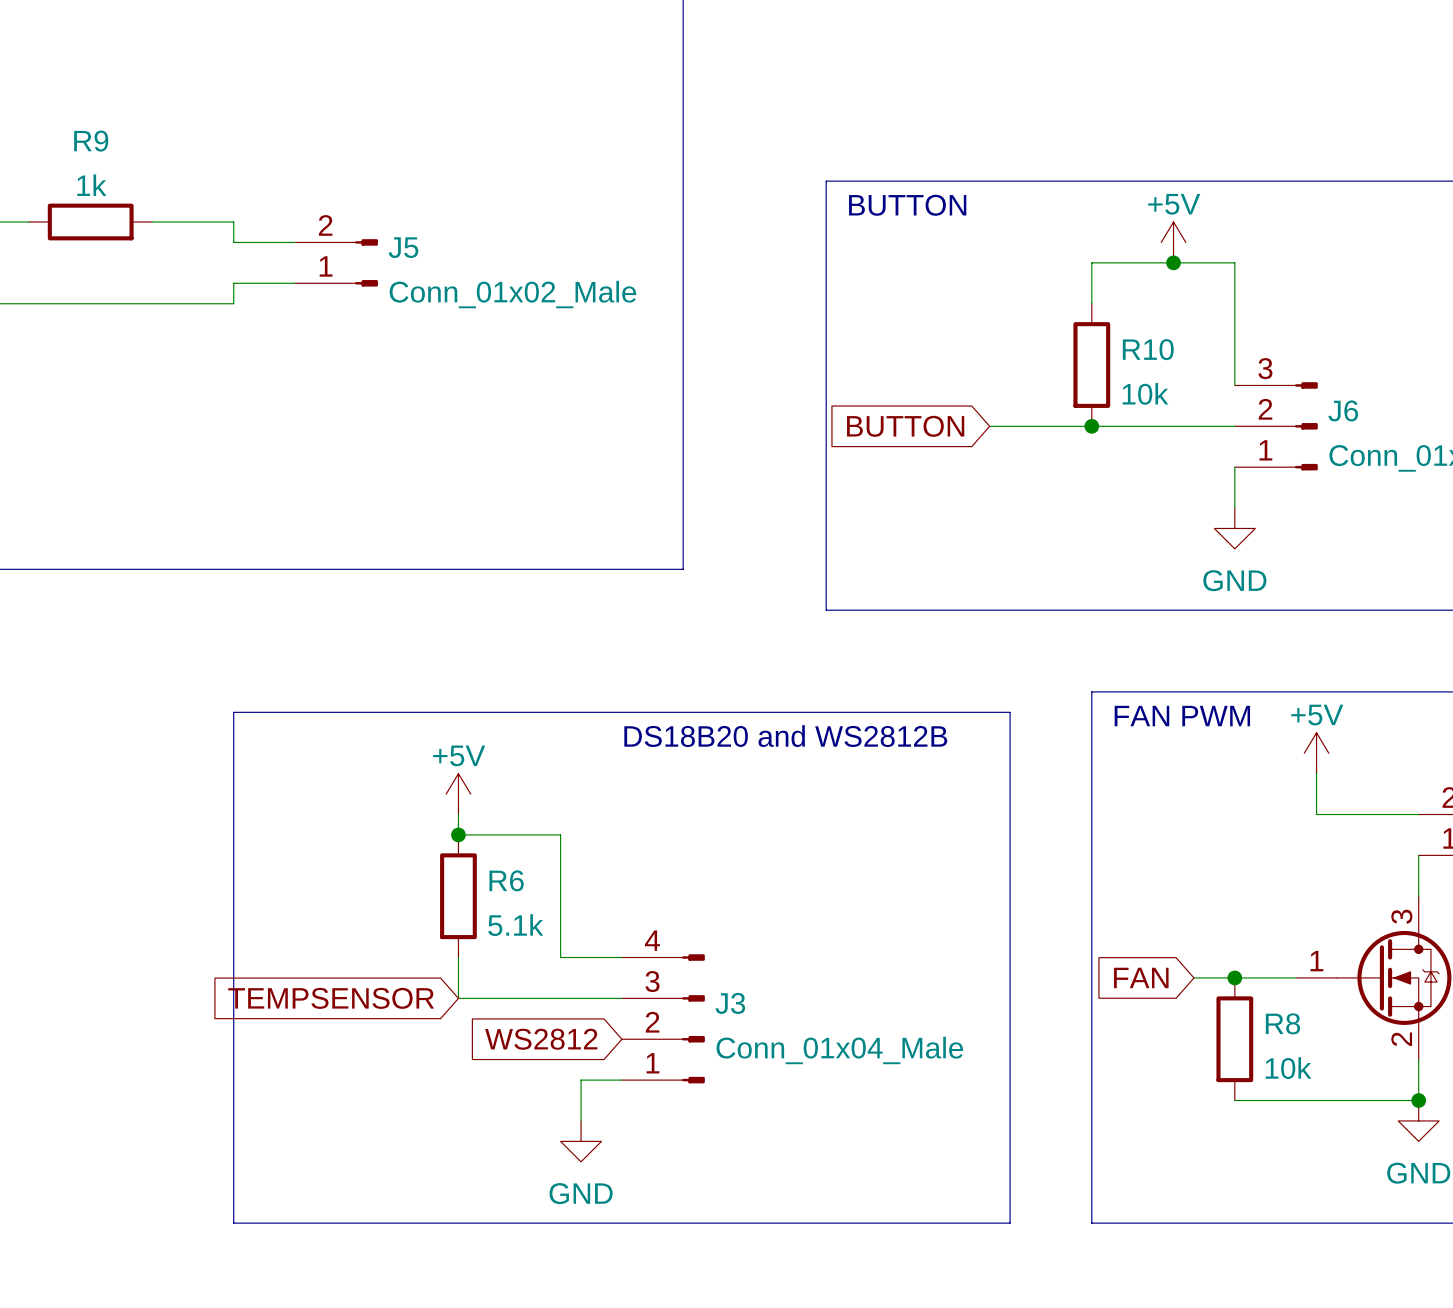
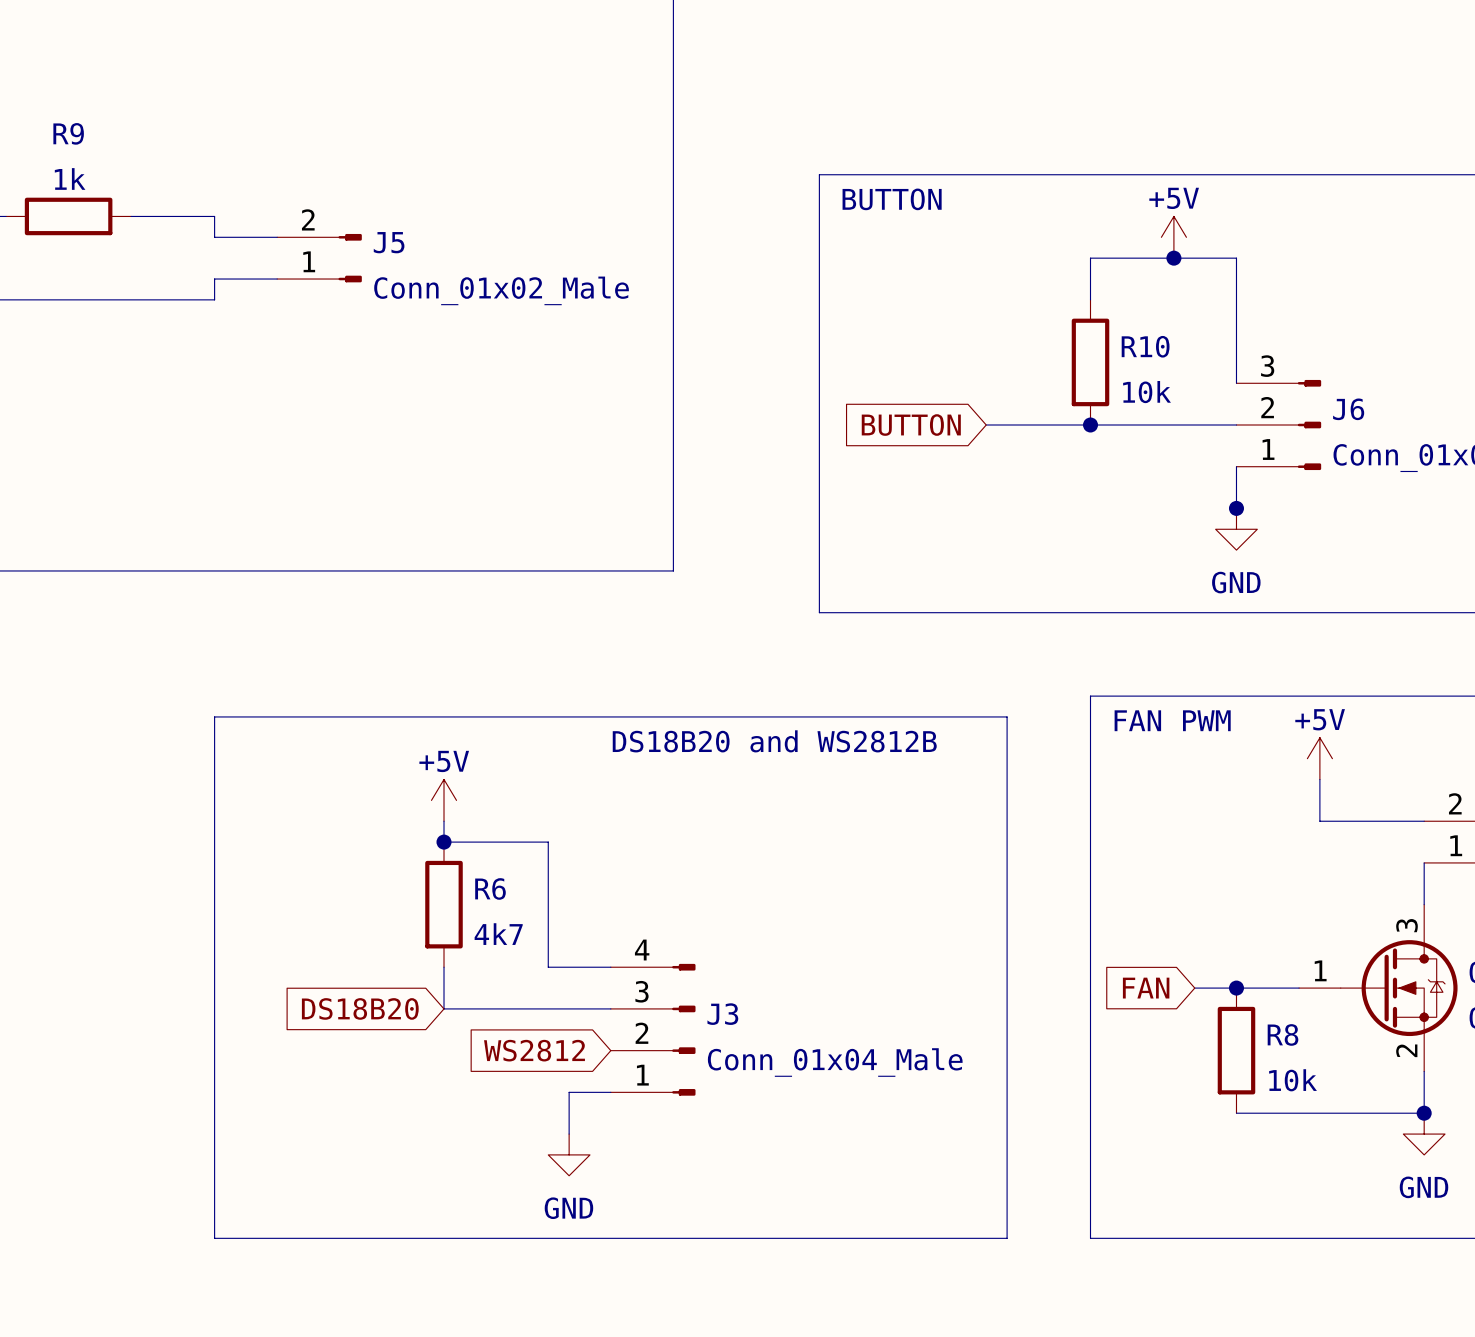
junction: none -> (1236, 508)
R6 value: 5.1k (515, 925) -> 4k7 (498, 934)
global label: TEMPSENSOR (331, 998) -> DS18B20 (360, 1008)

